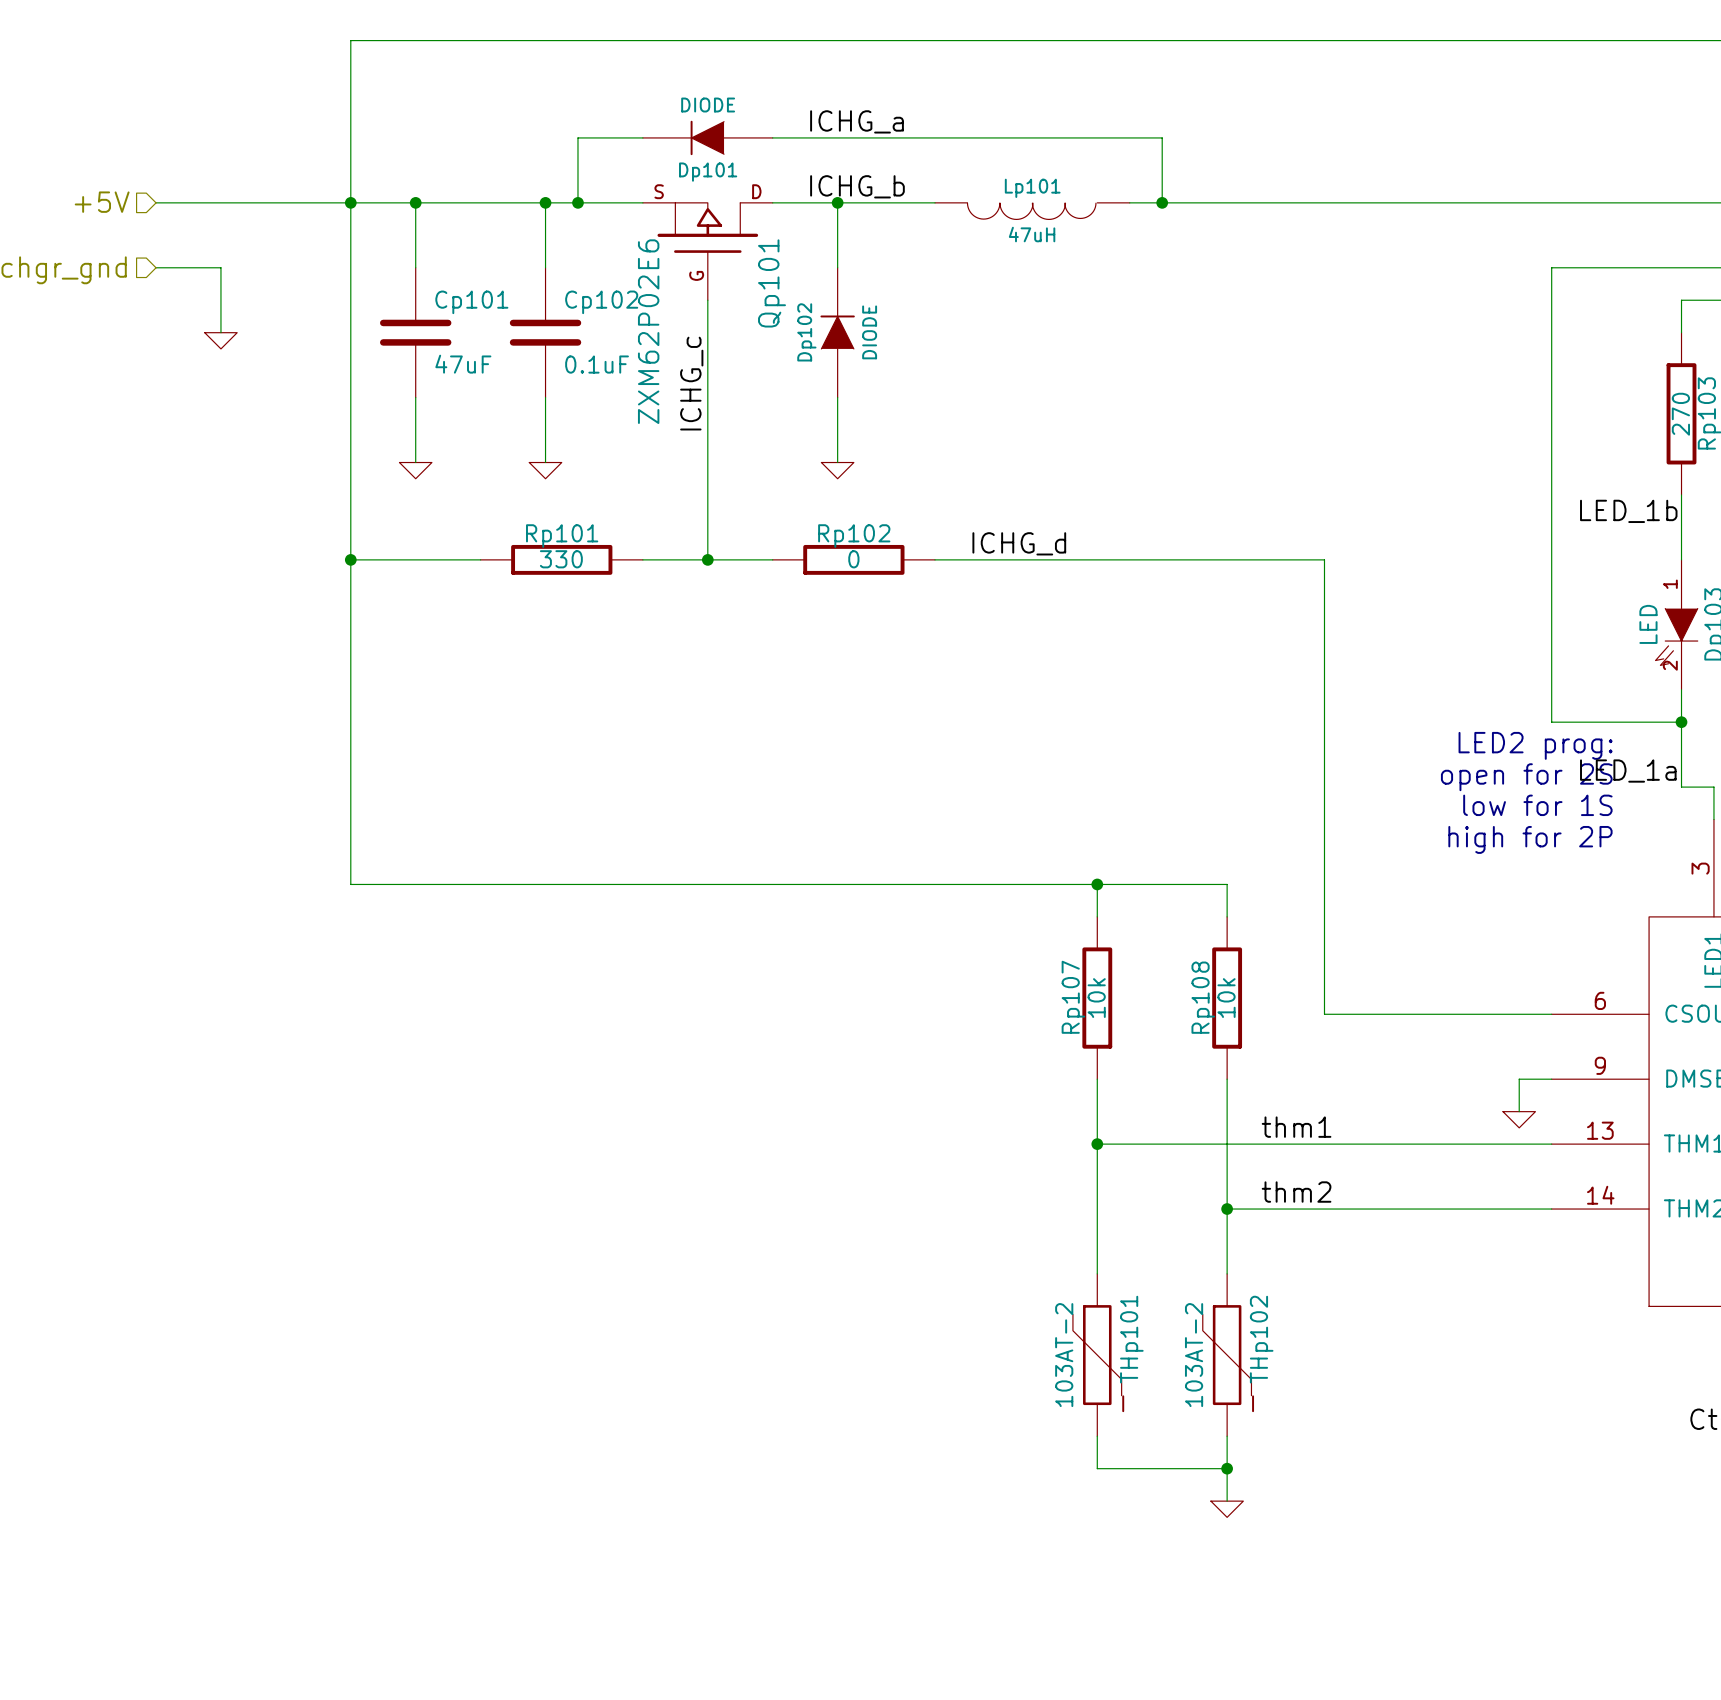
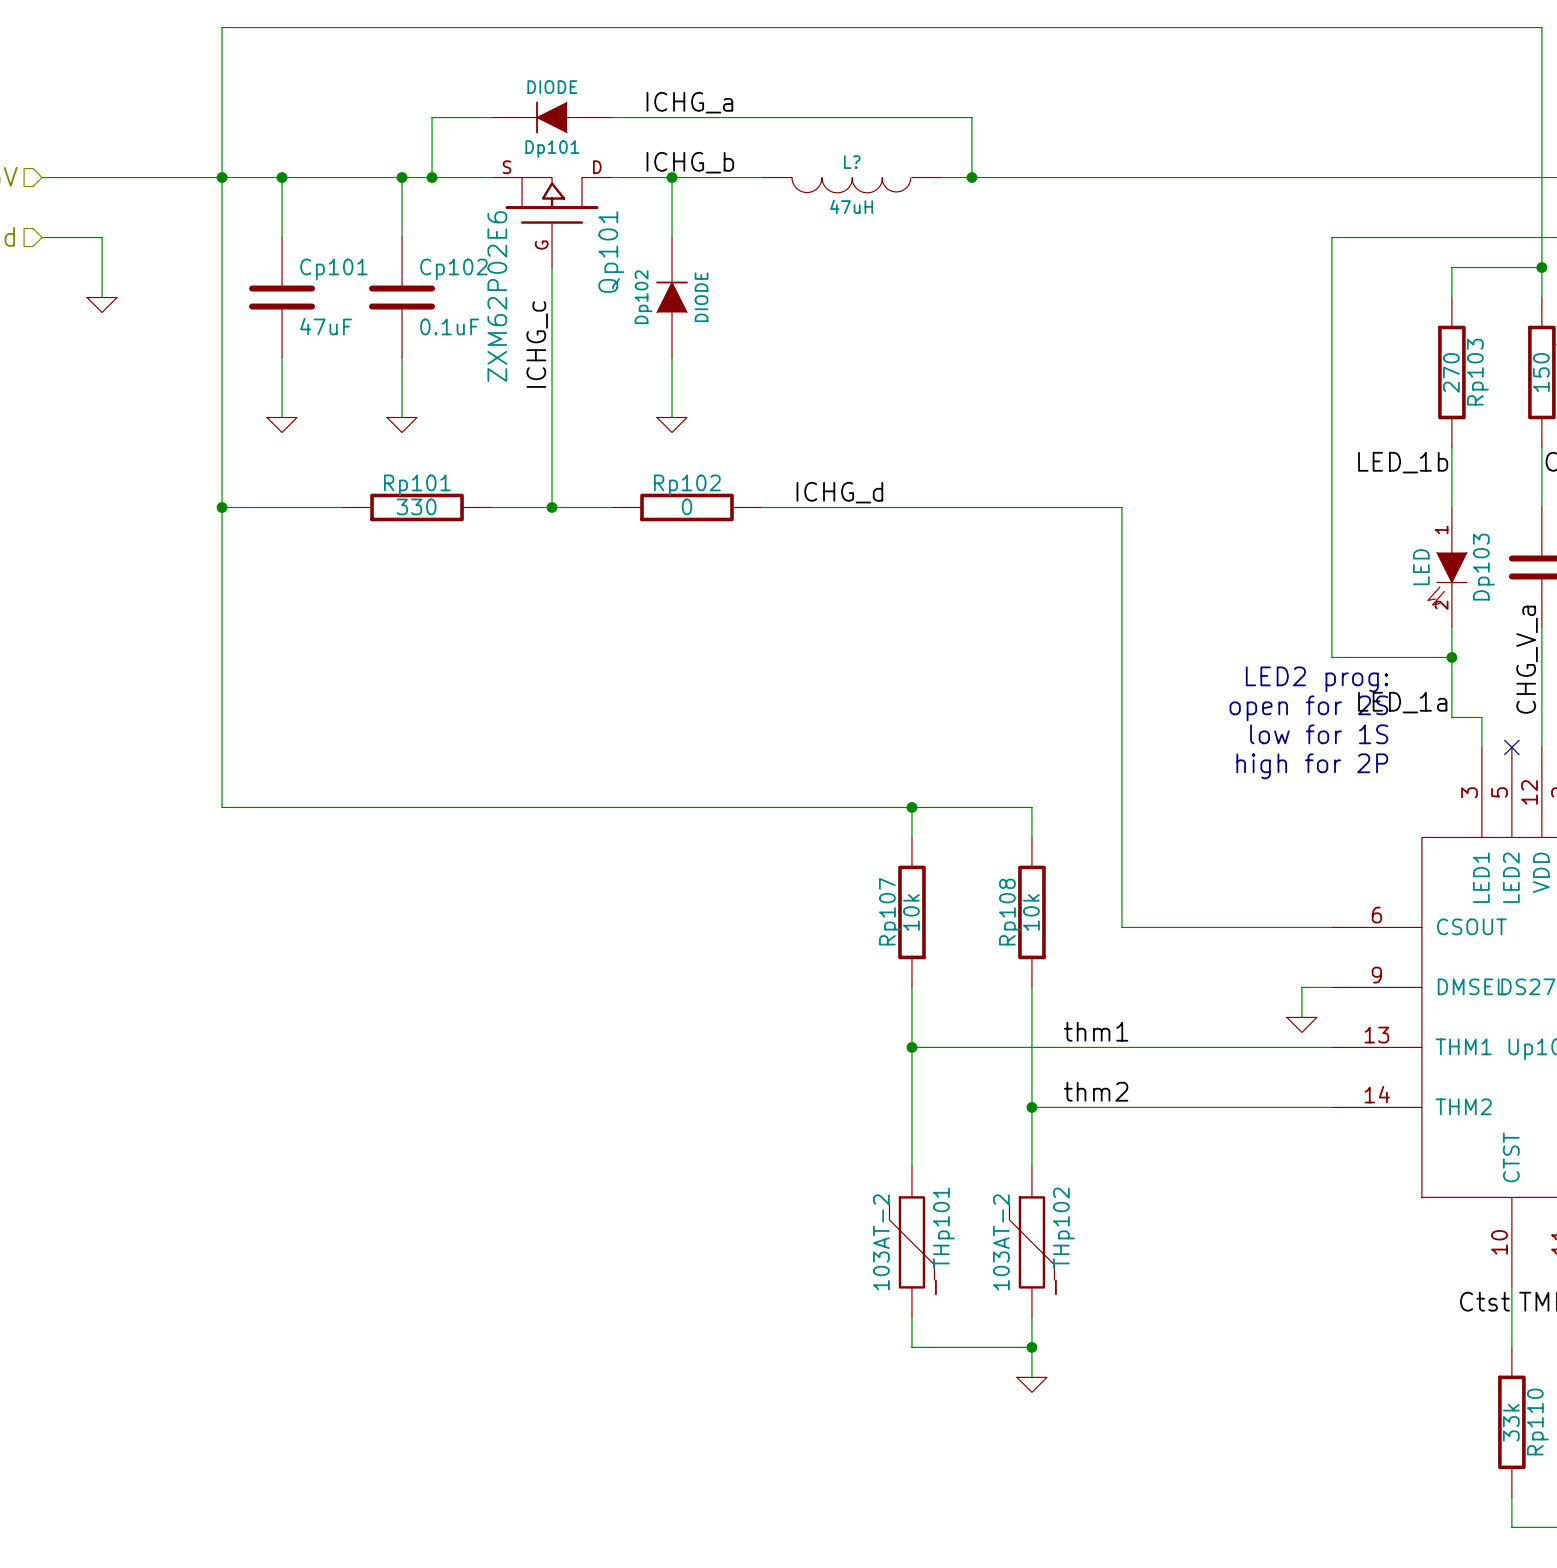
Lp101 name: Lp101 (1032, 188) -> L? (852, 162)

